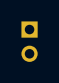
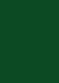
part: (29, 41) -> none

